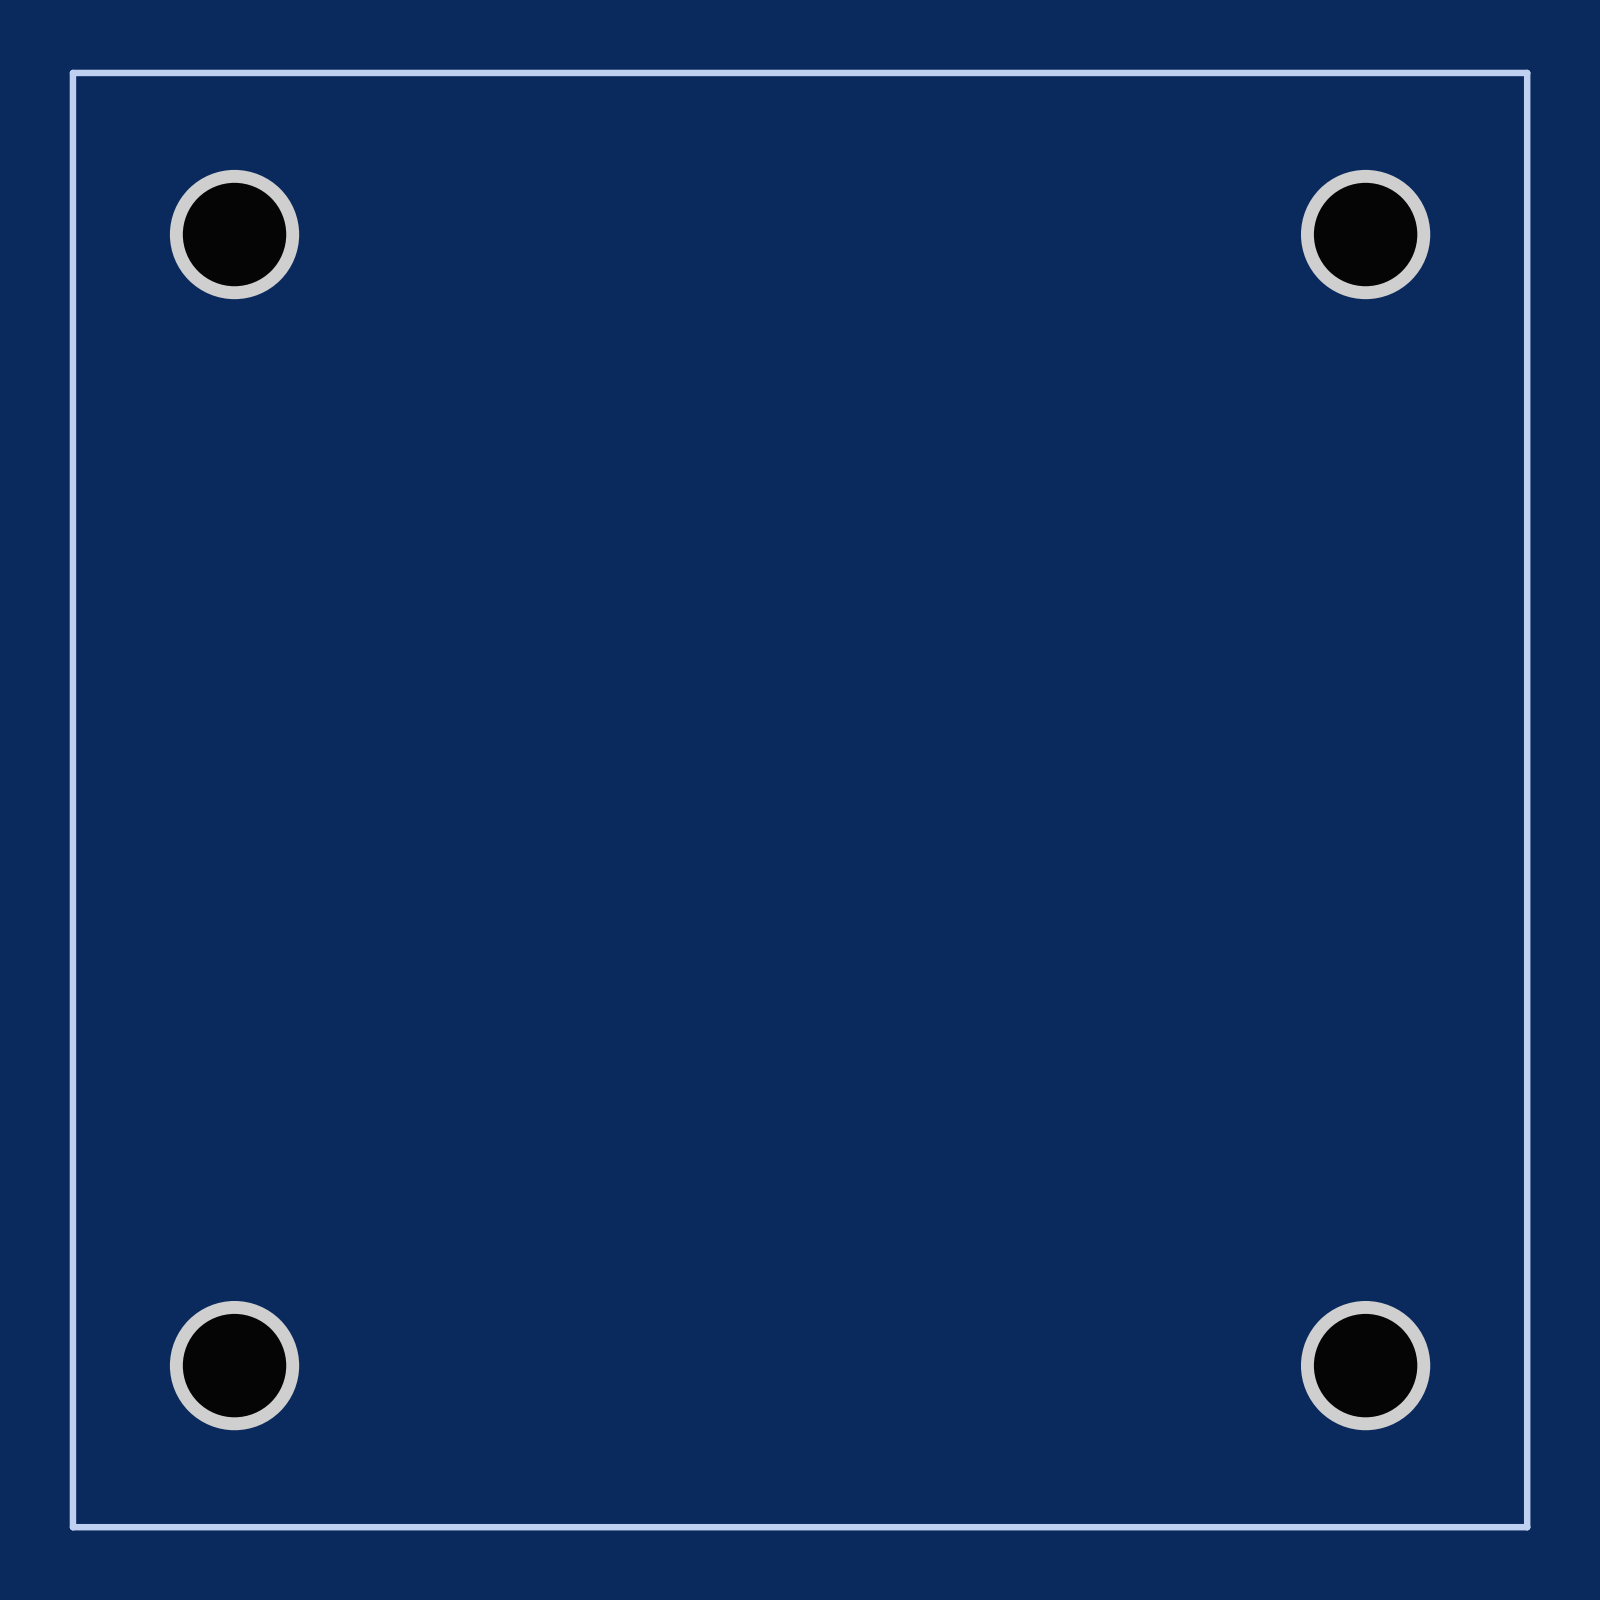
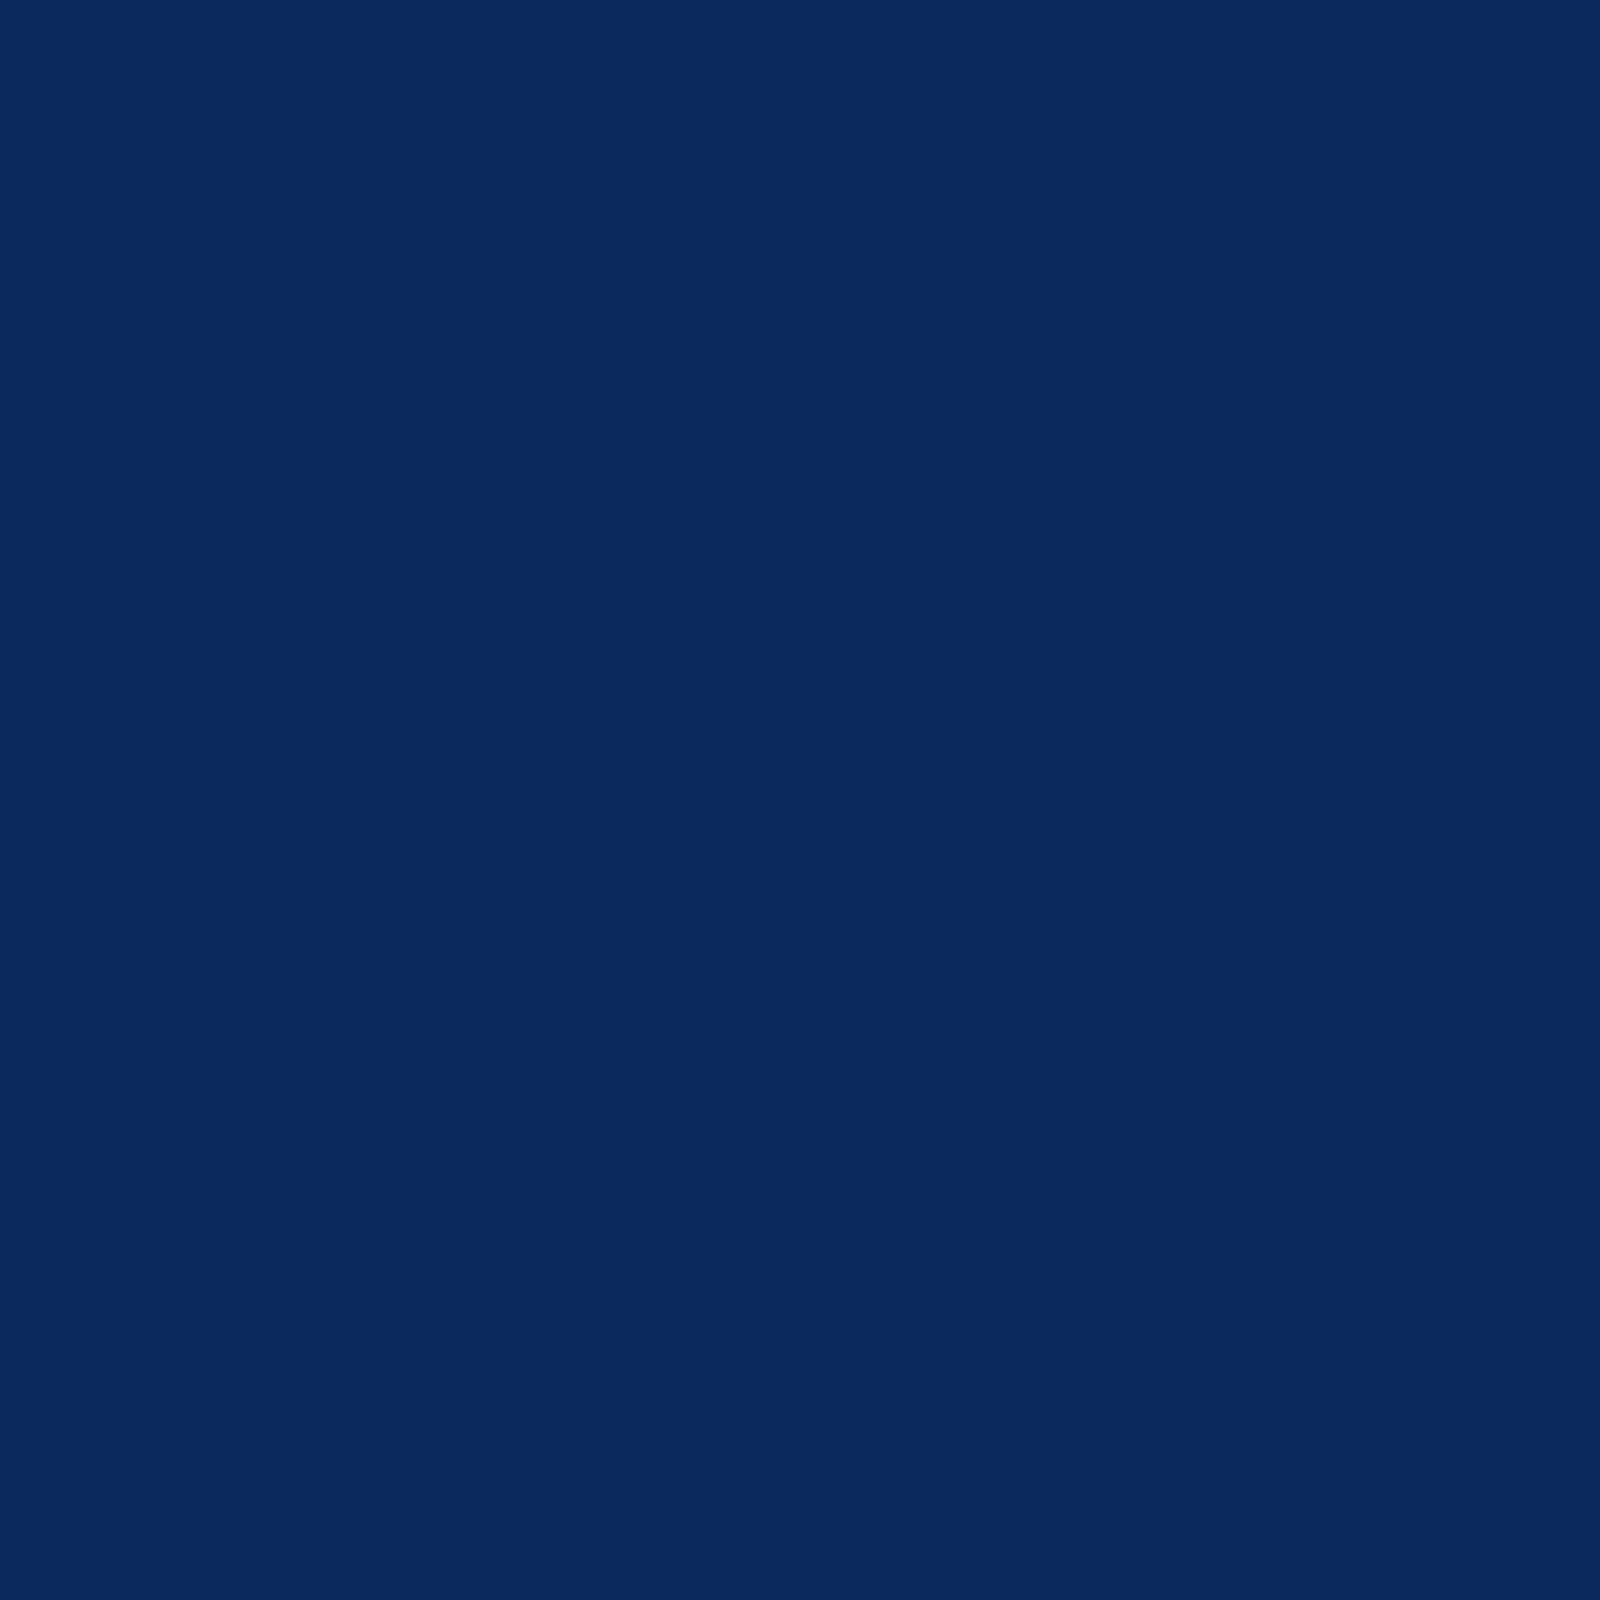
board edge: (1527, 72) (72, 72) (72, 1527) (1527, 1527) (1527, 72) -> none
part: (234, 234) -> none
part: (1365, 234) -> none
part: (234, 1365) -> none
part: (1365, 1365) -> none

